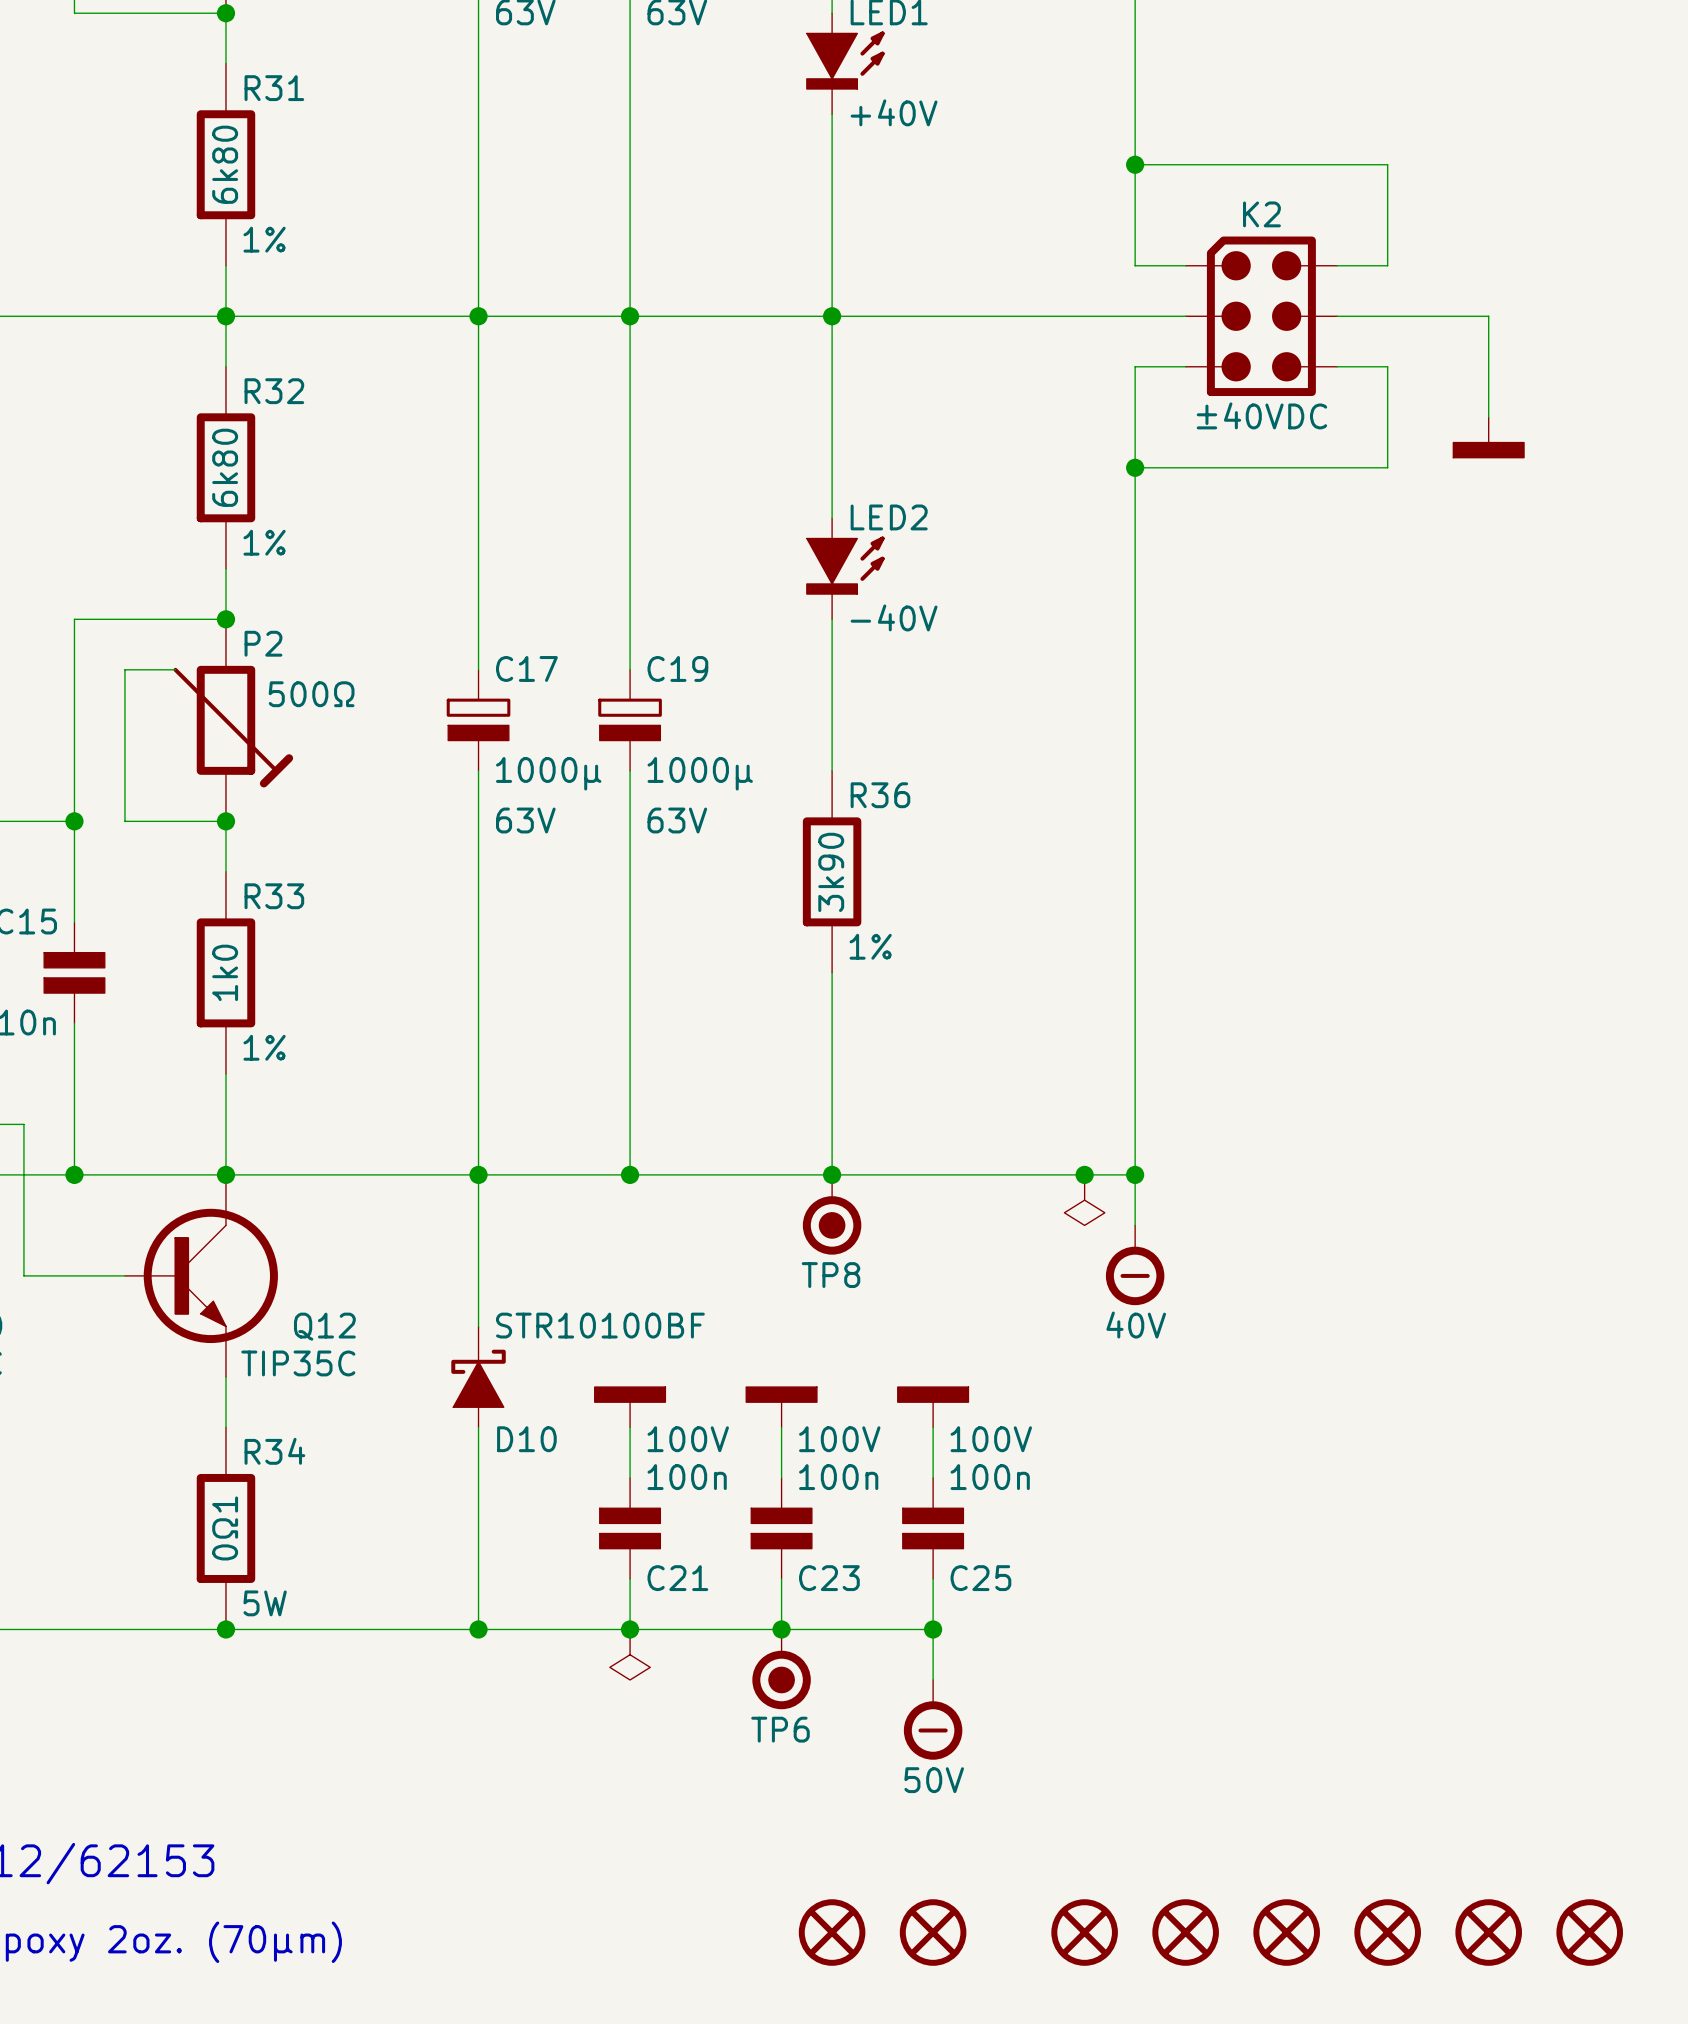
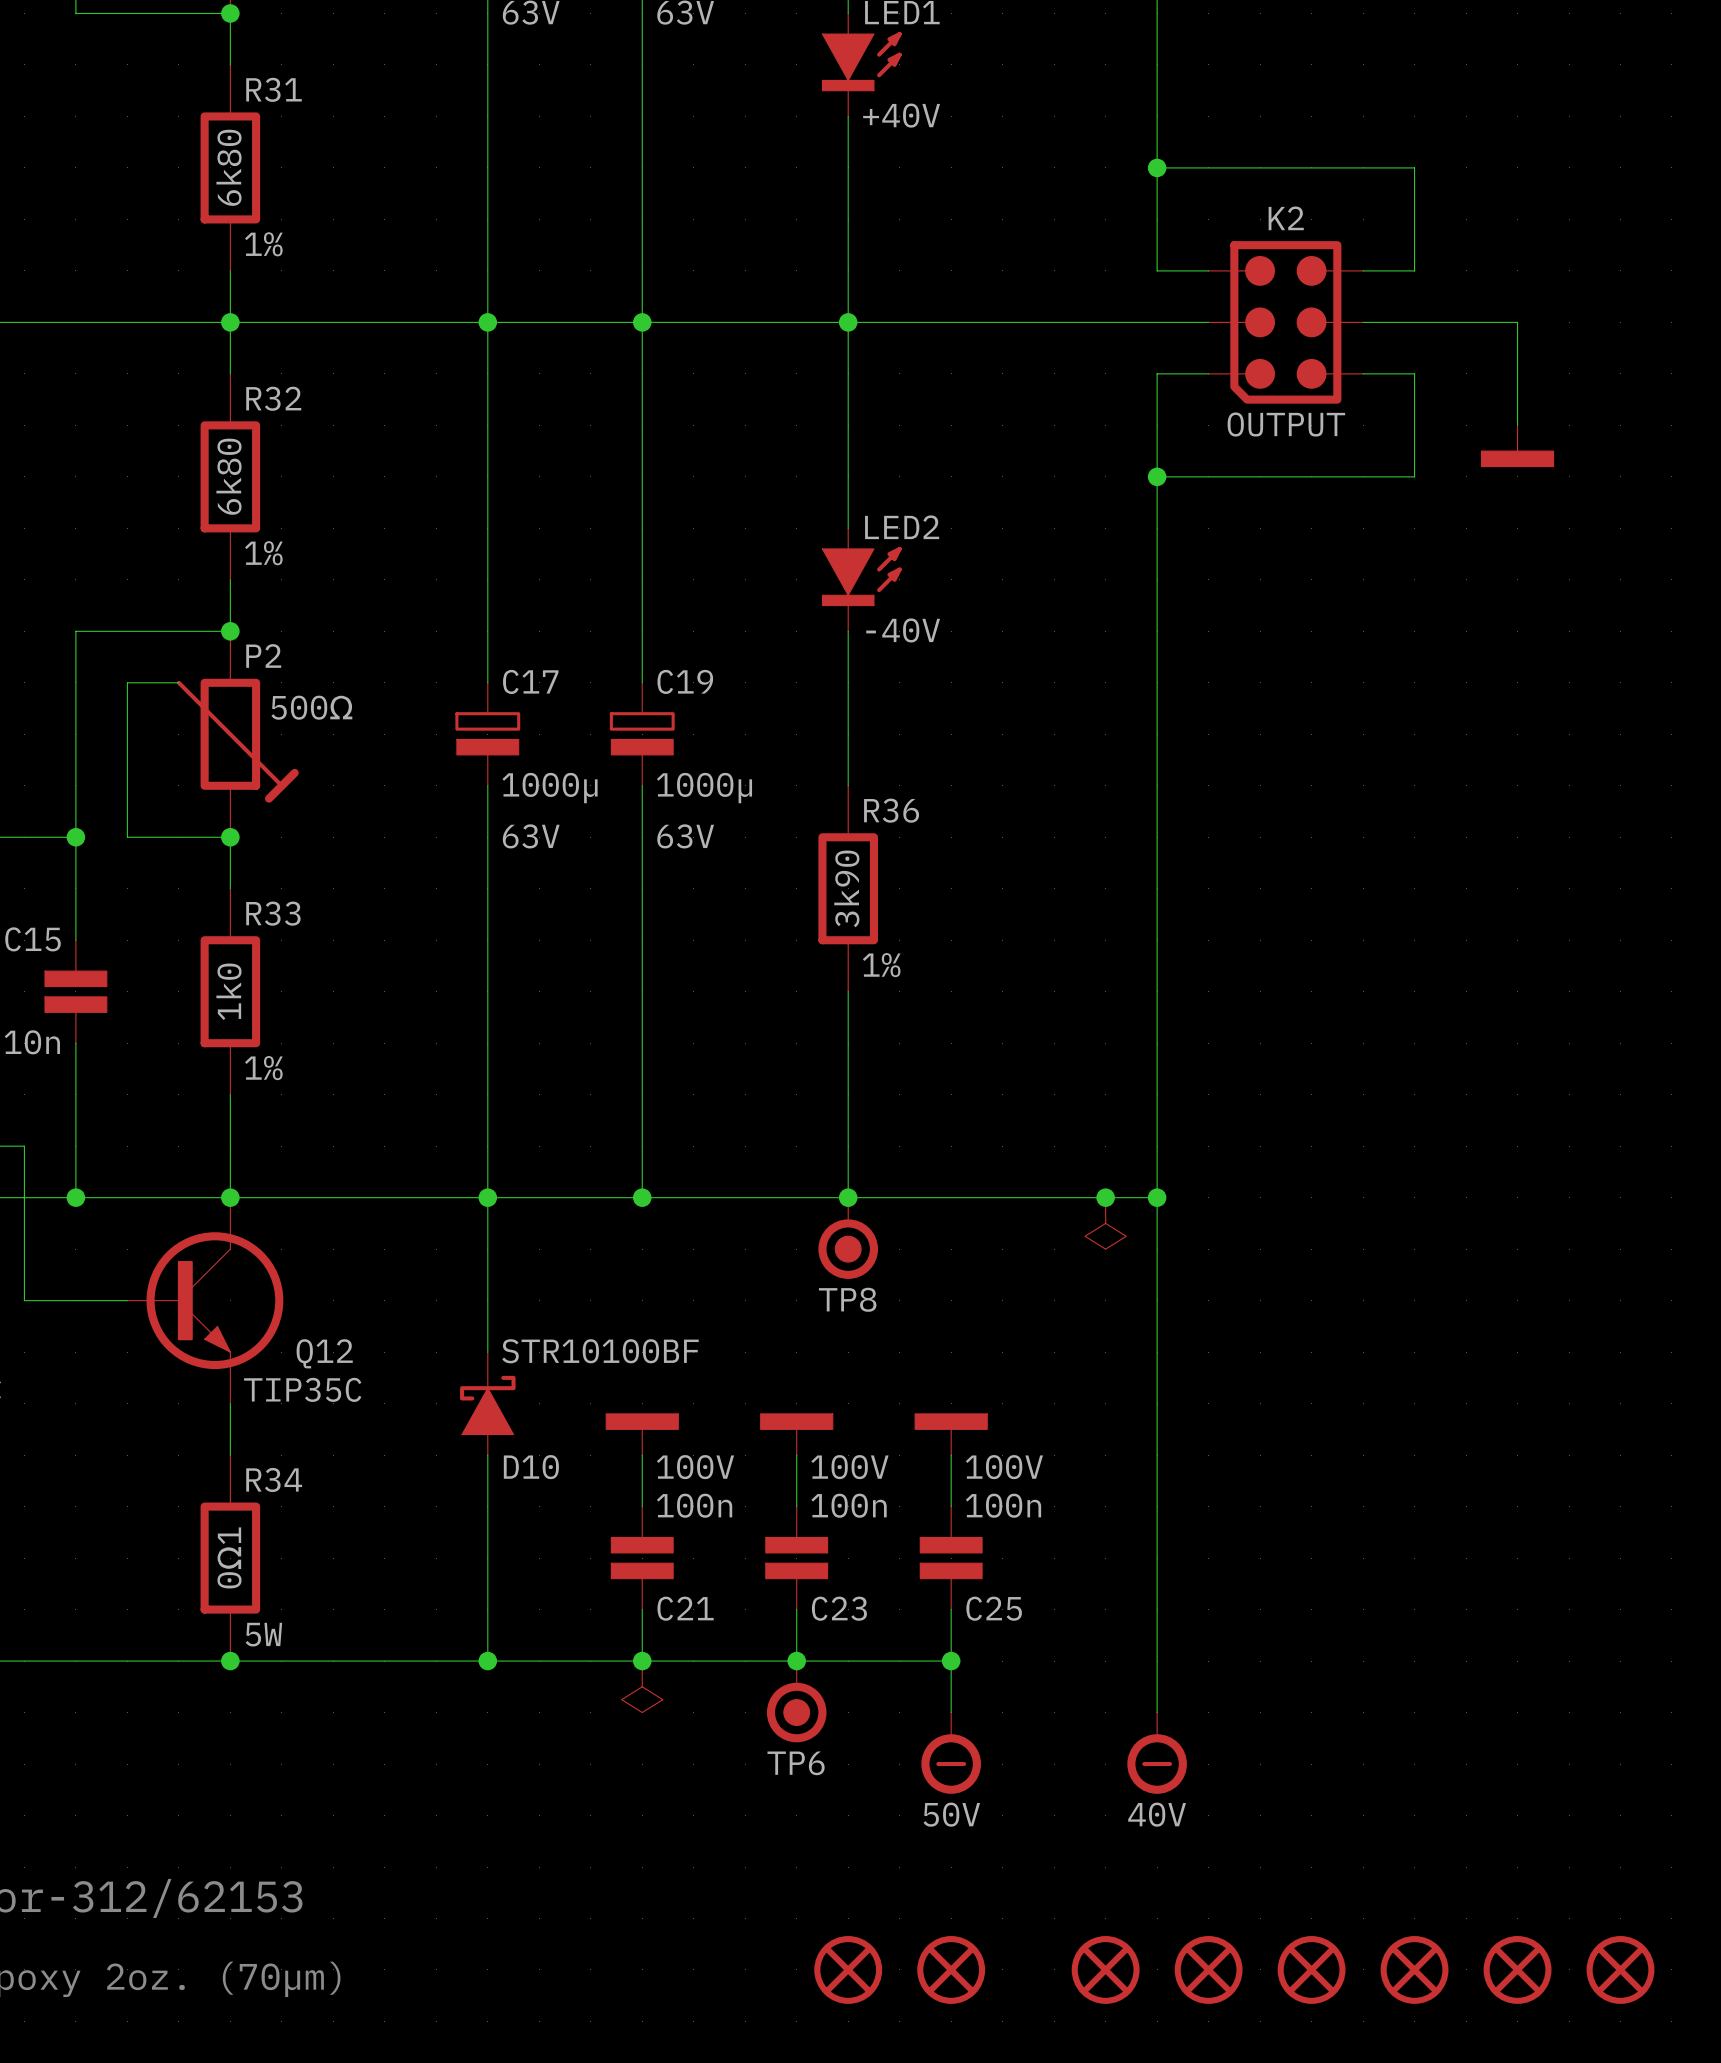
K2 flip: as is (1261, 316) -> up-down (1285, 322)
K2 value: ±40VDC (1261, 415) -> OUTPUT (1286, 424)
wire: none -> (1157, 1249) (1157, 1712)
power symbol position: (1135, 1265) -> (1157, 1753)

